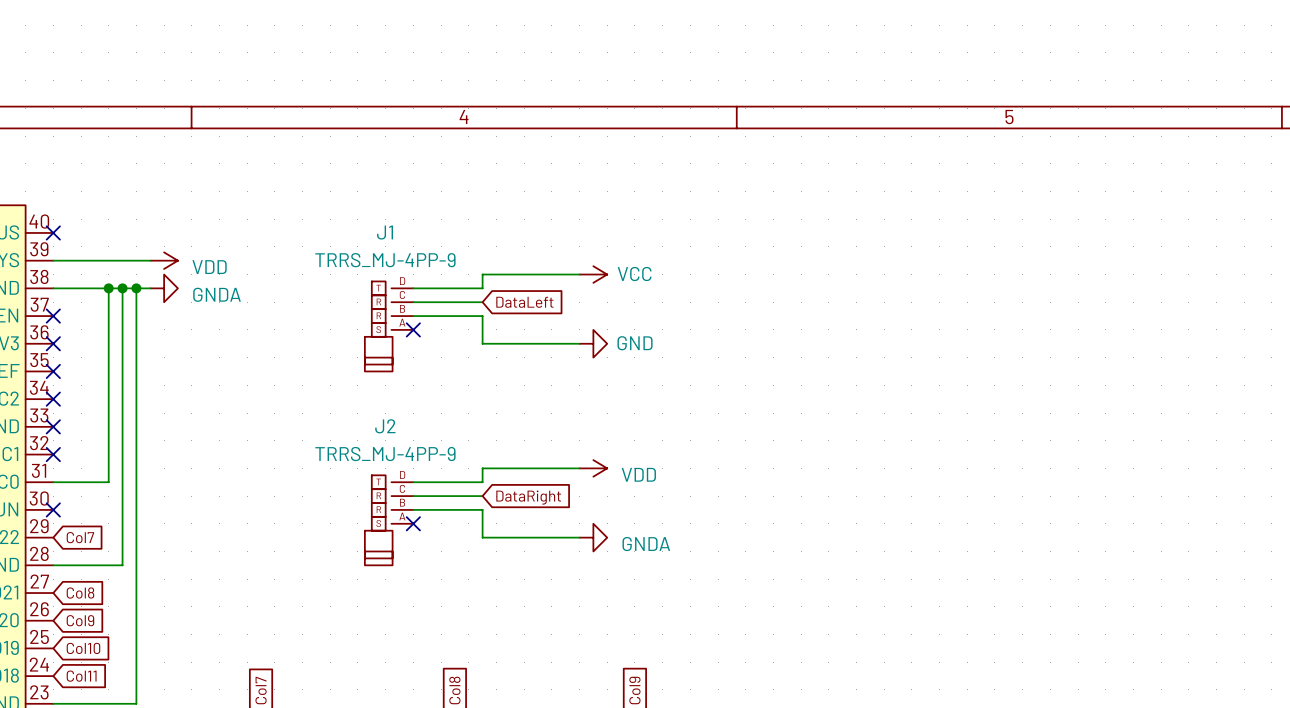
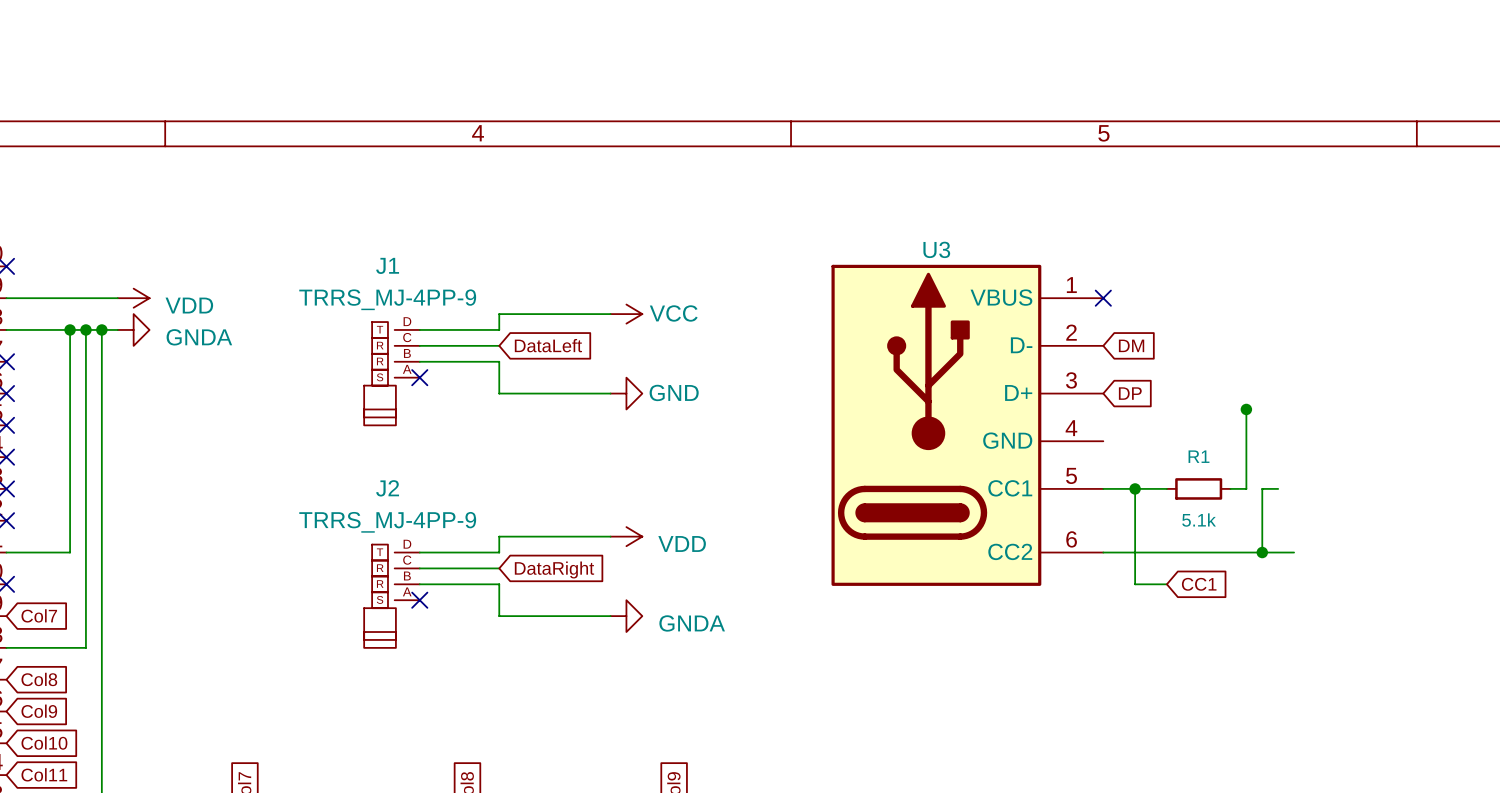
no-connect mark: none -> (1103, 298)
global label: none -> DM (1131, 345)
global label: none -> DP (1130, 393)
wire: none -> (1246, 409) (1246, 488) (1230, 488)
junction: none -> (1246, 409)
U3: none -> (967, 425)
wire: none -> (1103, 488) (1166, 488)
wire: none -> (1135, 488) (1135, 584) (1166, 584)
junction: none -> (1135, 488)
R1: none -> 5.1k (1198, 488)
wire: none -> (1278, 488) (1262, 488) (1262, 552)
wire: none -> (1103, 552) (1294, 552)
junction: none -> (1262, 552)
global label: none -> CC1 (1199, 584)

